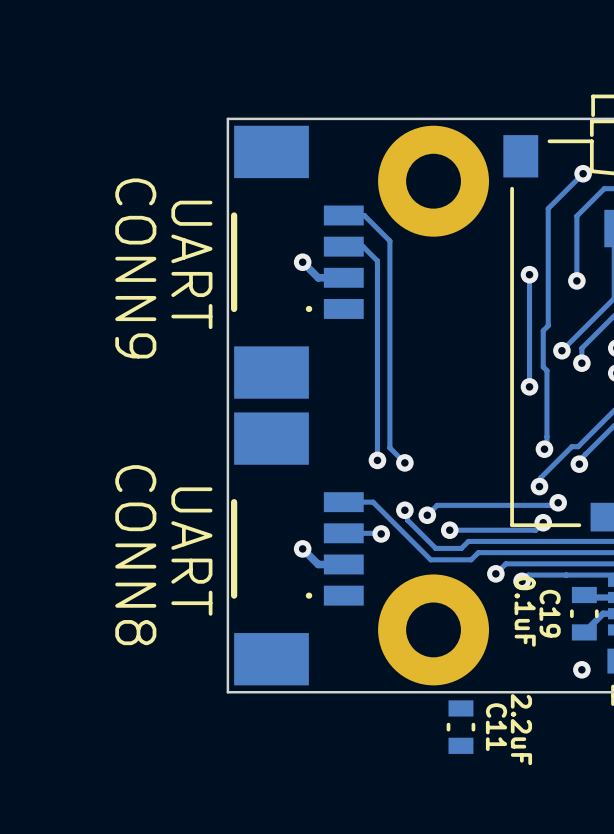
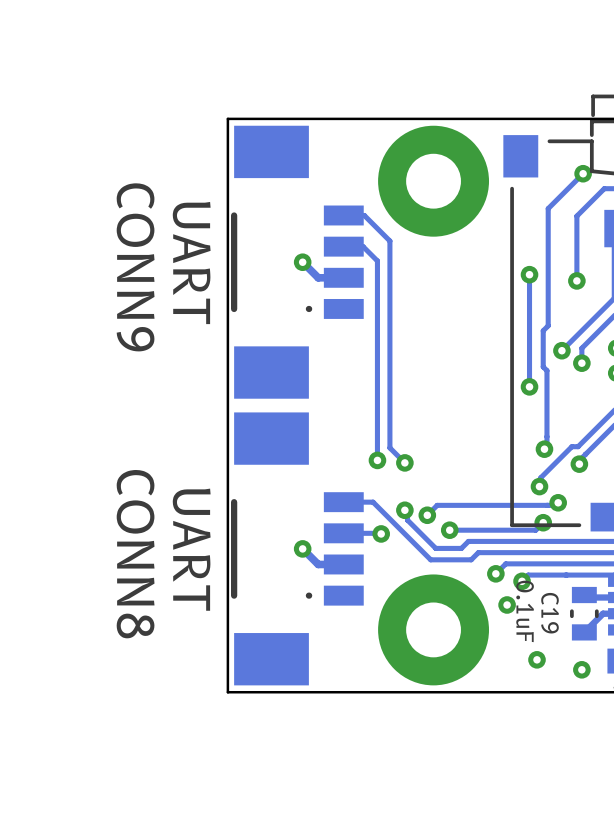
via: none -> (507, 604)
via: none -> (536, 659)
C11: 2.2uF (460, 727) -> none

